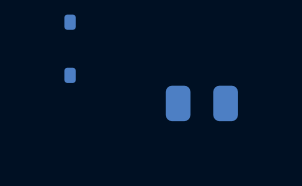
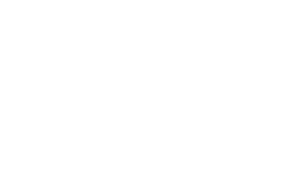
part: (70, 48) -> none
part: (201, 103) -> none

